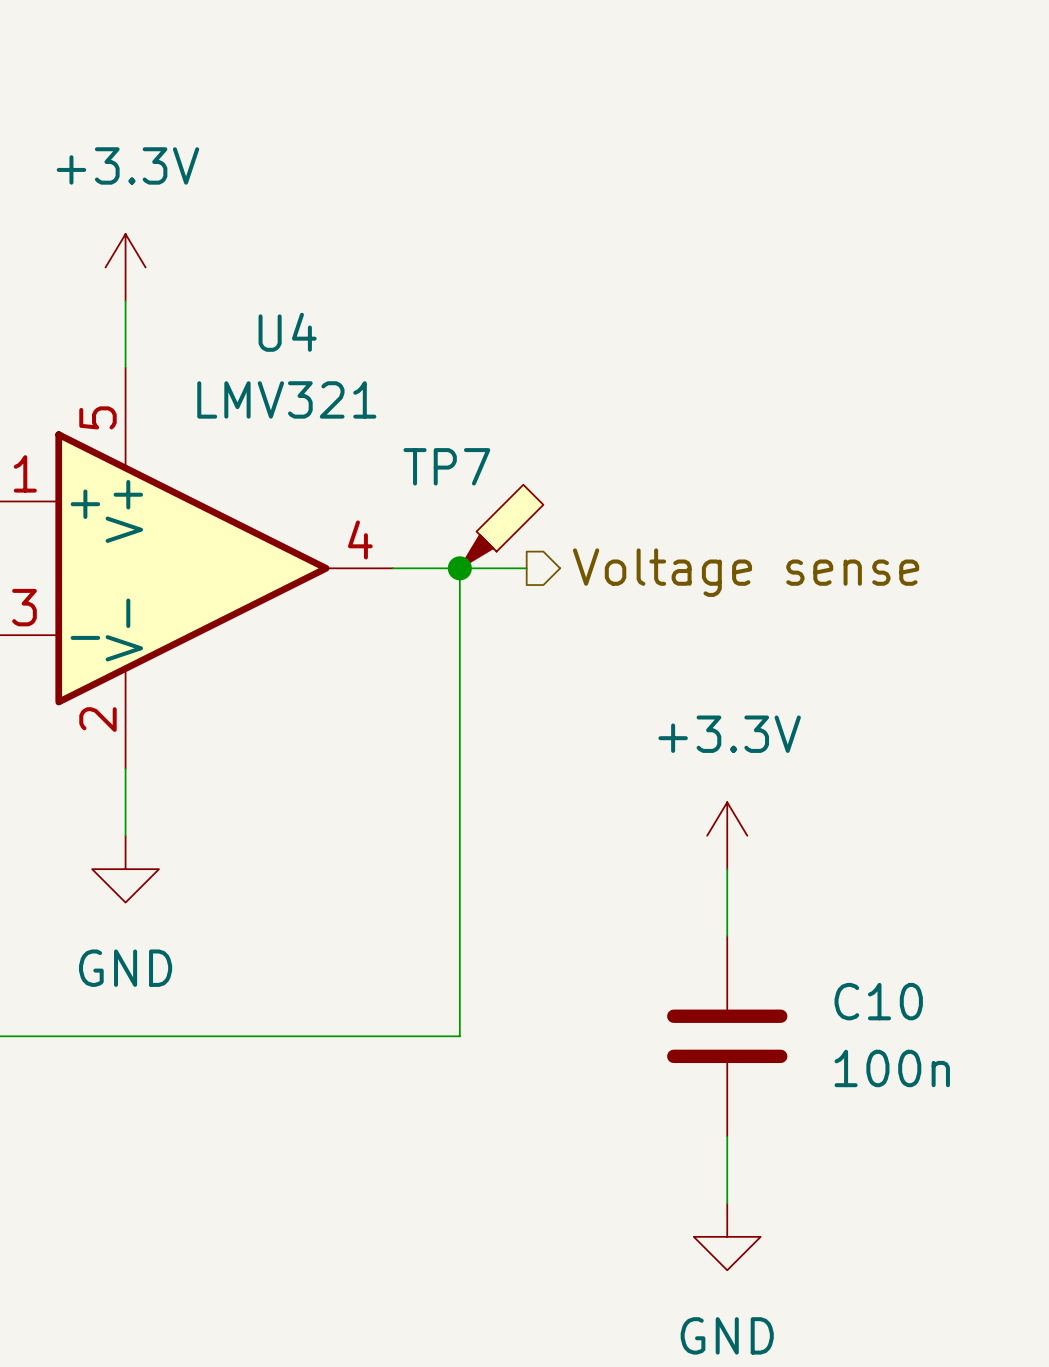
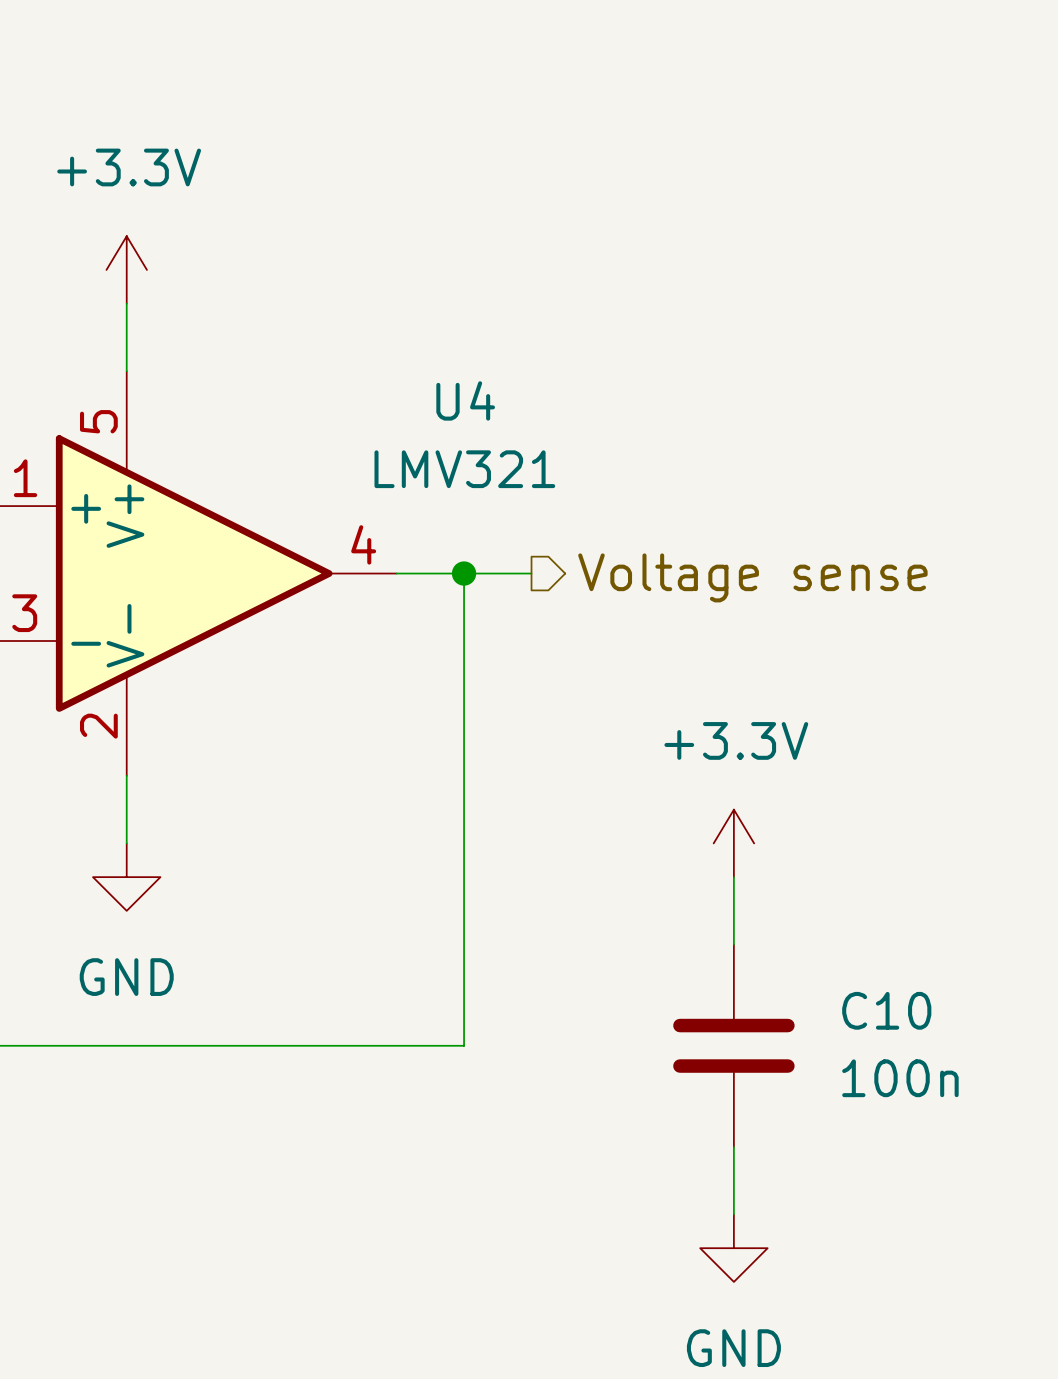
U4 name position: U4 (287, 332) -> U4 (465, 400)
U4 value position: LMV321 (286, 399) -> LMV321 (464, 469)
TP7: (501, 526) -> none

